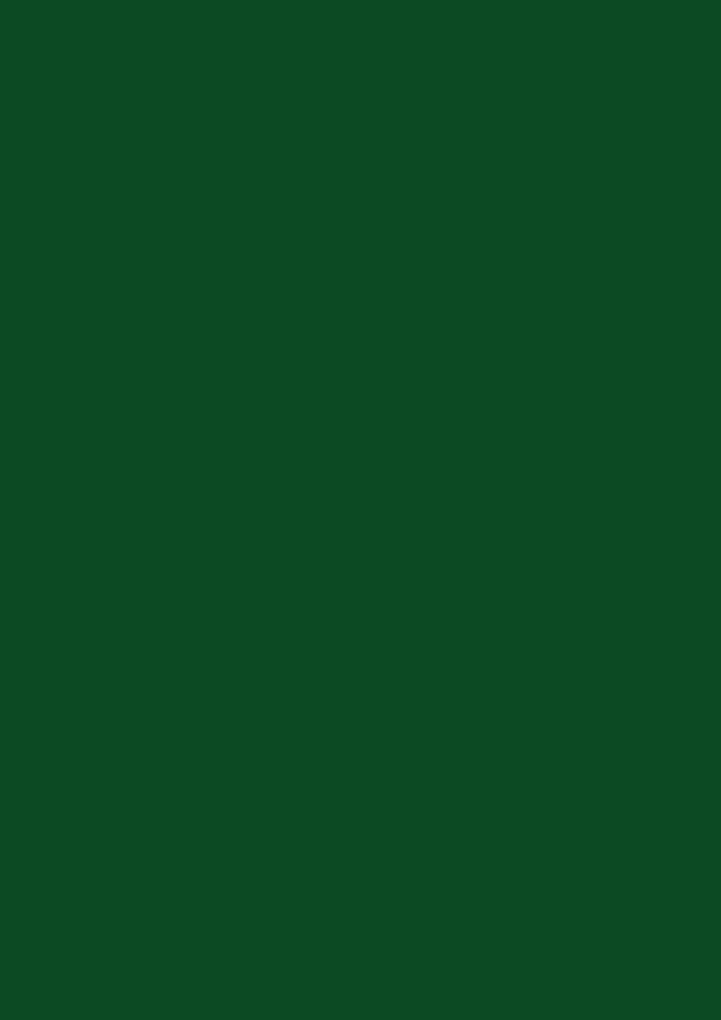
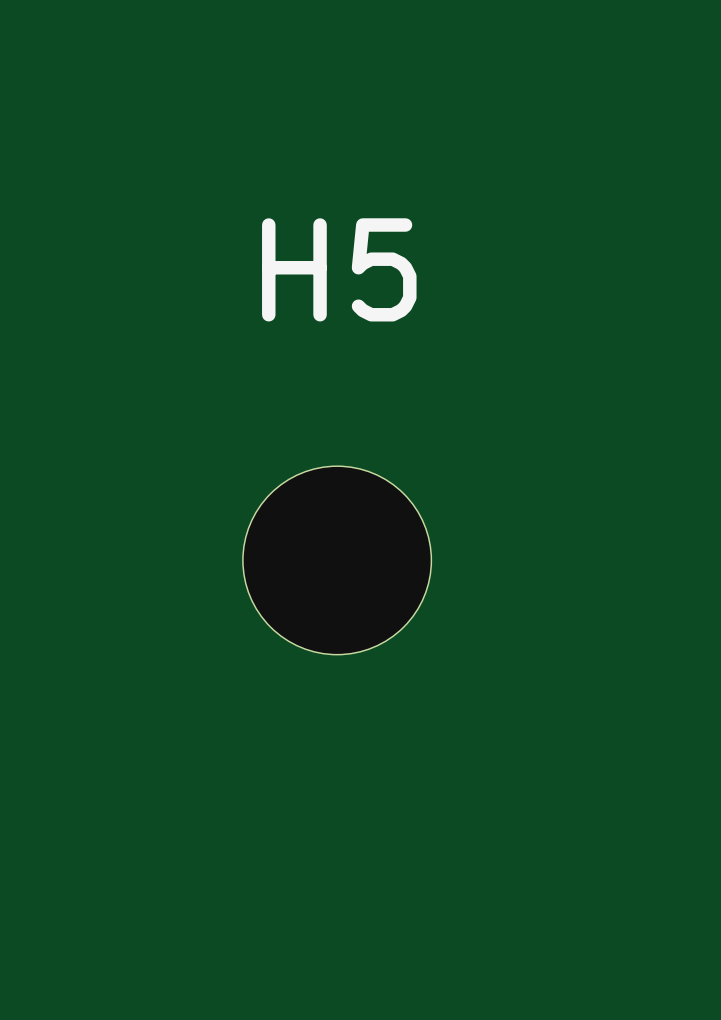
H5: none -> (337, 560)

